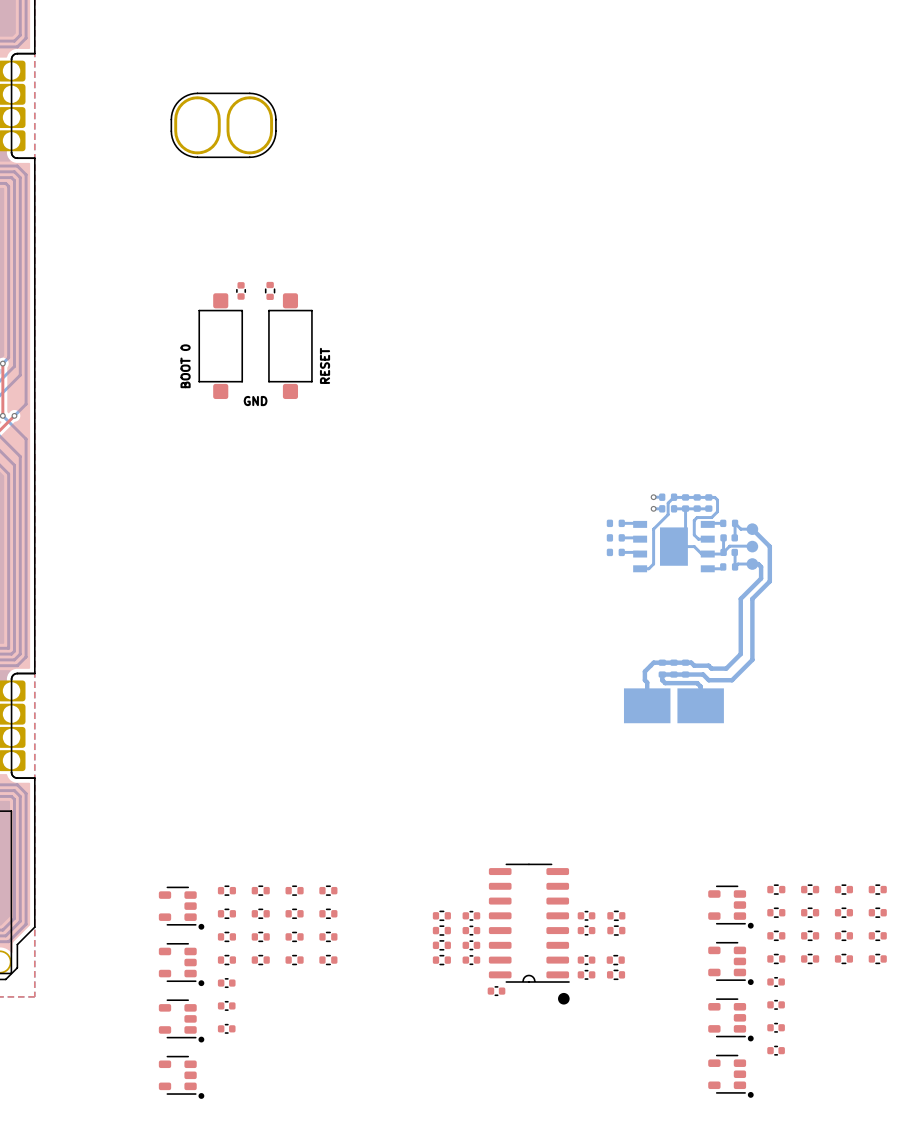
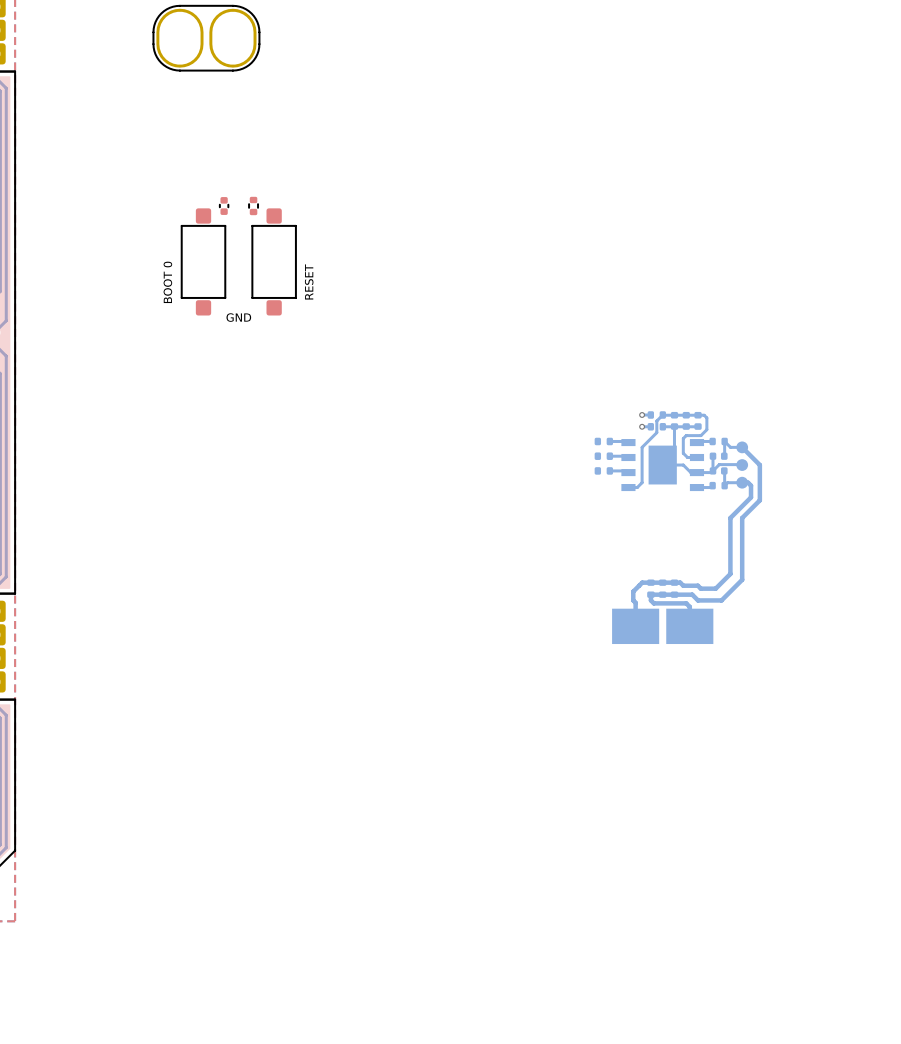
part: (776, 889) -> none
part: (810, 889) -> none
part: (843, 889) -> none
part: (877, 889) -> none
part: (226, 890) -> none
part: (260, 890) -> none
part: (294, 890) -> none
part: (328, 890) -> none
part: (730, 907) -> none
part: (181, 908) -> none
part: (776, 912) -> none
part: (810, 912) -> none
part: (843, 912) -> none
part: (877, 912) -> none
part: (226, 913) -> none
part: (260, 913) -> none
part: (294, 913) -> none
part: (328, 913) -> none
part: (441, 915) -> none
part: (471, 915) -> none
part: (586, 915) -> none
part: (616, 915) -> none
part: (441, 930) -> none
part: (471, 930) -> none
part: (586, 930) -> none
part: (616, 930) -> none
part: (529, 934) -> none
part: (776, 935) -> none
part: (810, 935) -> none
part: (843, 935) -> none
part: (877, 935) -> none
part: (226, 936) -> none
part: (260, 936) -> none
part: (294, 936) -> none
part: (328, 936) -> none
part: (441, 945) -> none
part: (471, 945) -> none
part: (776, 958) -> none
part: (810, 958) -> none
part: (843, 958) -> none
part: (877, 958) -> none
part: (226, 960) -> none
part: (260, 960) -> none
part: (294, 960) -> none
part: (328, 960) -> none
part: (441, 960) -> none
part: (471, 960) -> none
part: (586, 960) -> none
part: (615, 960) -> none
part: (730, 963) -> none
part: (181, 964) -> none
part: (586, 974) -> none
part: (616, 974) -> none
part: (776, 981) -> none
part: (226, 983) -> none
part: (496, 991) -> none
part: (776, 1004) -> none
part: (226, 1005) -> none
part: (730, 1019) -> none
part: (181, 1020) -> none
part: (776, 1027) -> none
part: (226, 1028) -> none
part: (776, 1050) -> none
part: (730, 1076) -> none
part: (181, 1077) -> none

